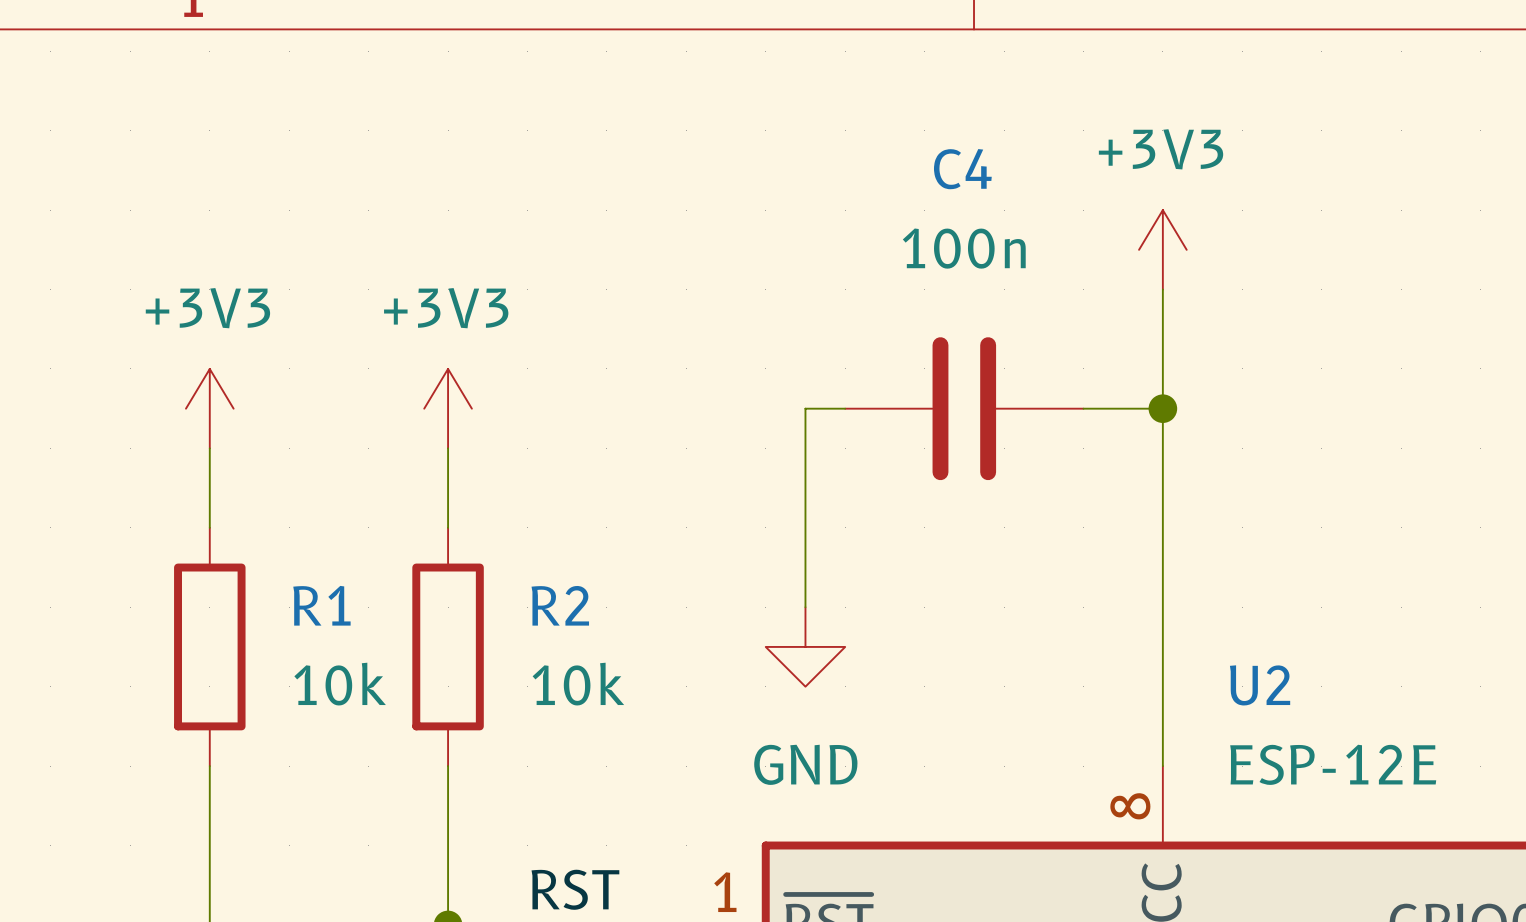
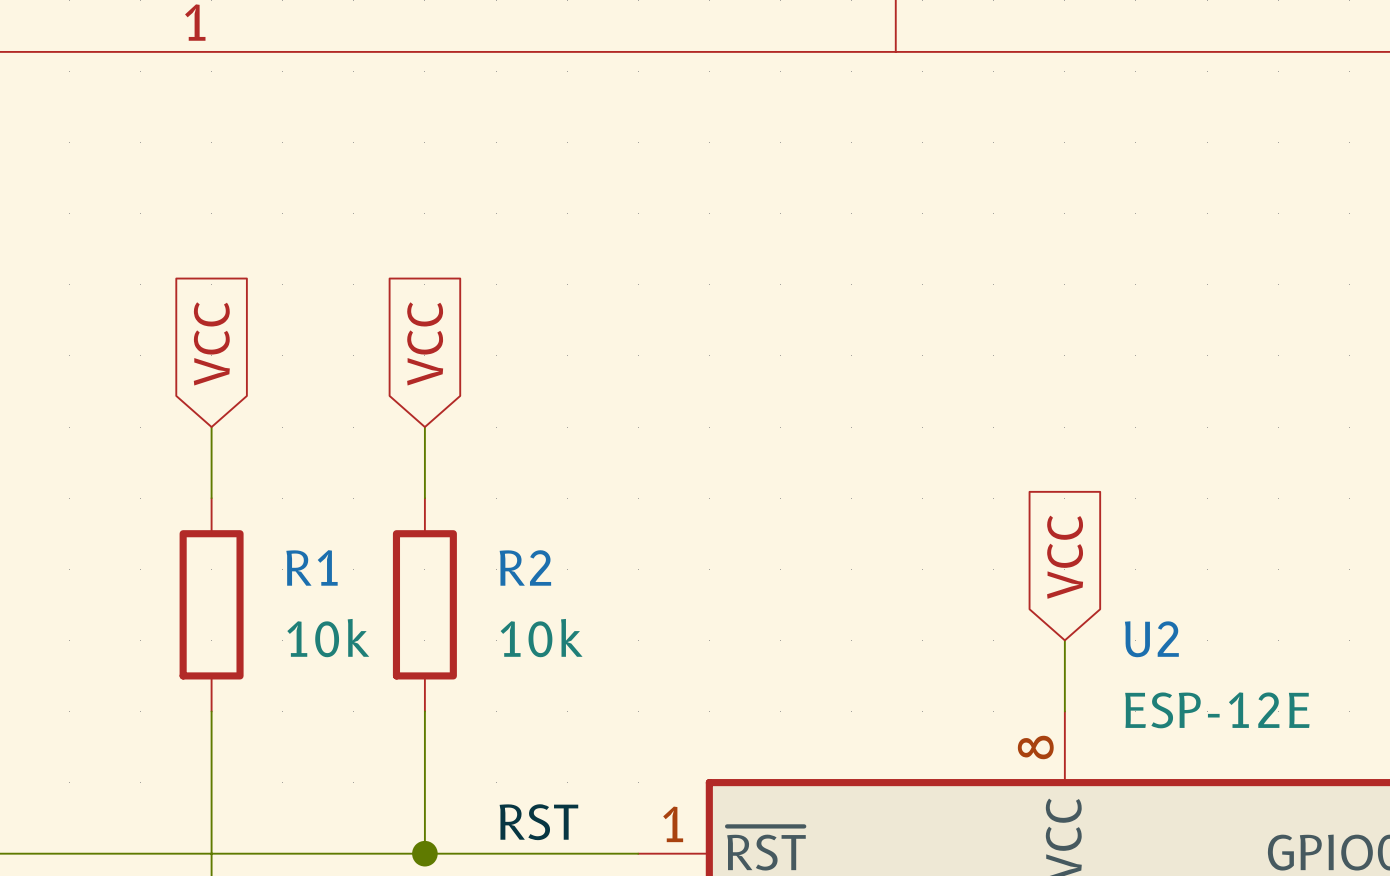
power symbol: +3V3 (1162, 249) -> none
wire: (1162, 289) (1162, 686) -> none
global label: none -> VCC (211, 343)
global label: none -> VCC (425, 343)
power symbol: +3V3 (209, 408) -> none
power symbol: +3V3 (448, 408) -> none
wire: (845, 408) (805, 408) (805, 607) -> none
C4: 100n (964, 408) -> none
wire: (1083, 408) (1162, 408) -> none
junction: (1162, 408) -> none
global label: none -> VCC (1065, 557)
power symbol: GND (805, 646) -> none

